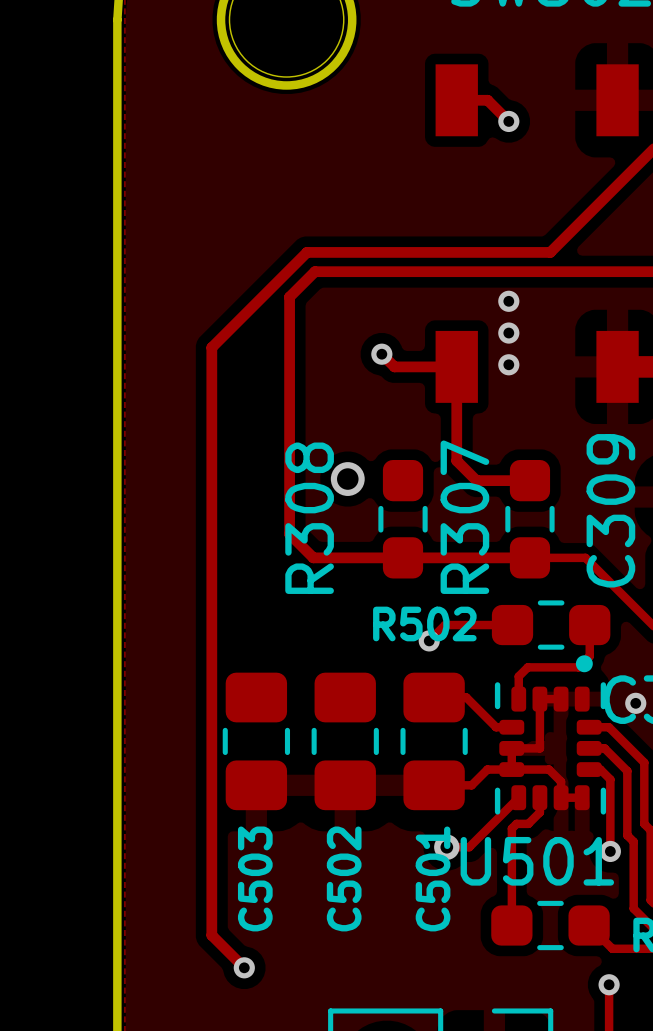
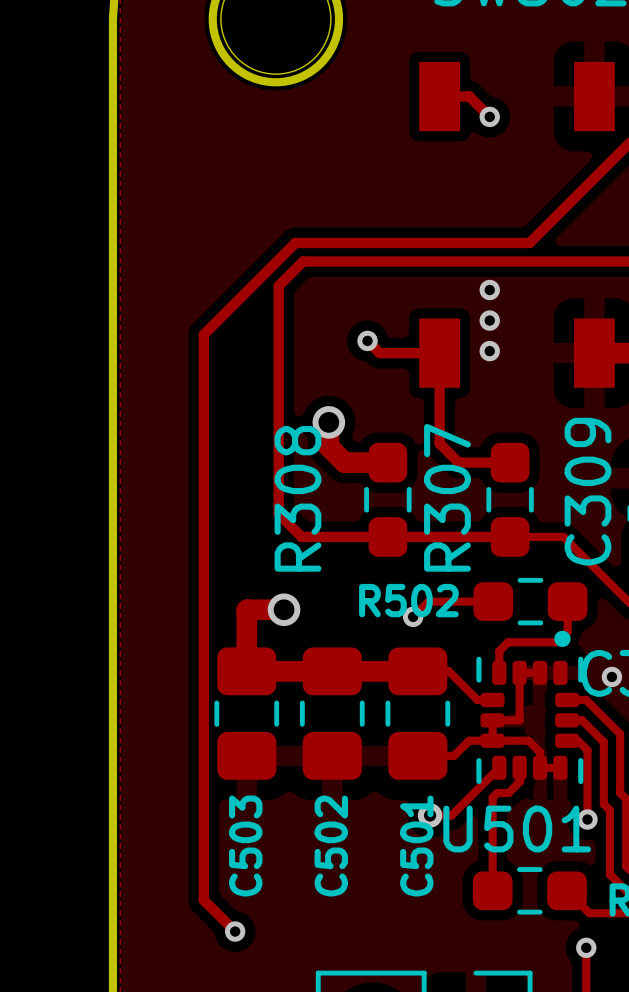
track: none -> (328, 422) (328, 446) (344, 462) (387, 462)
via position: (347, 479) -> (328, 422)
track: none -> (284, 609) (246, 610) (246, 671) (417, 671)
via: none -> (284, 609)

